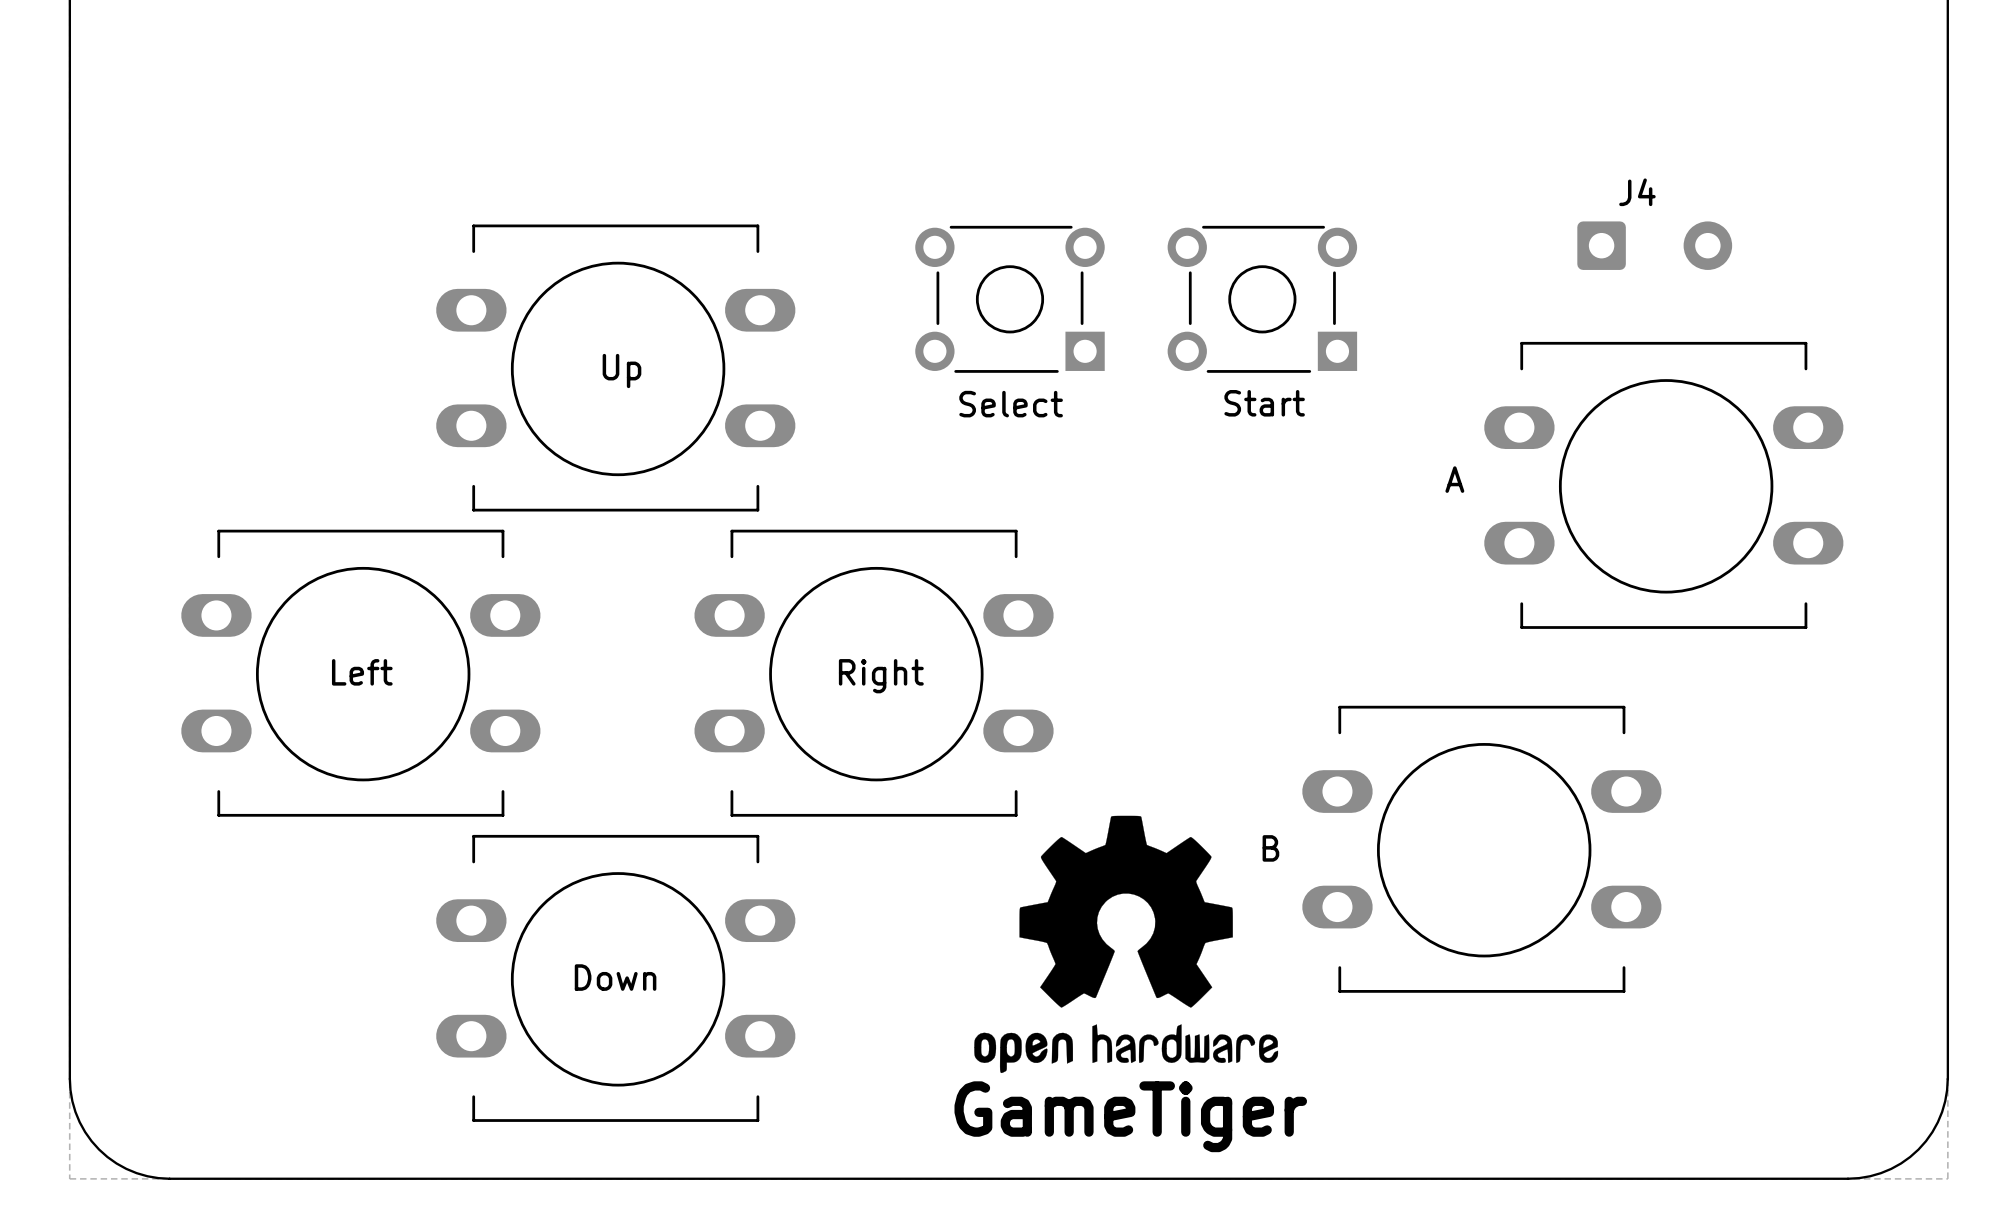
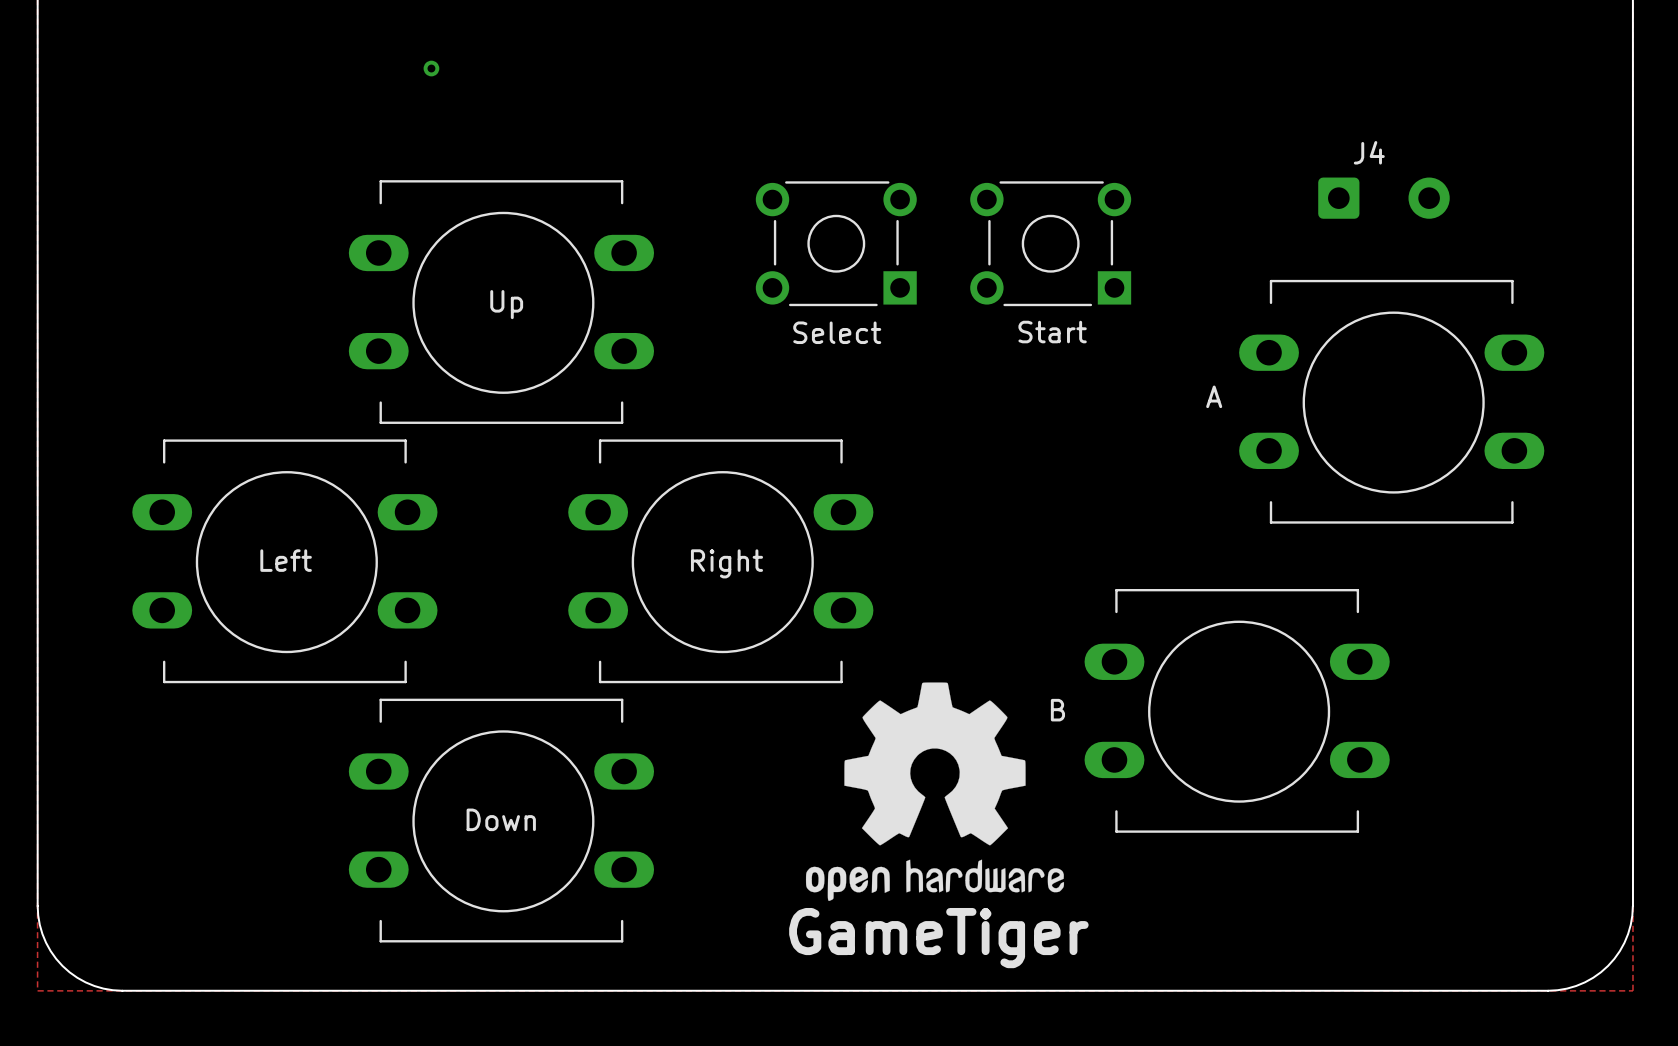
via: none -> (431, 68)

